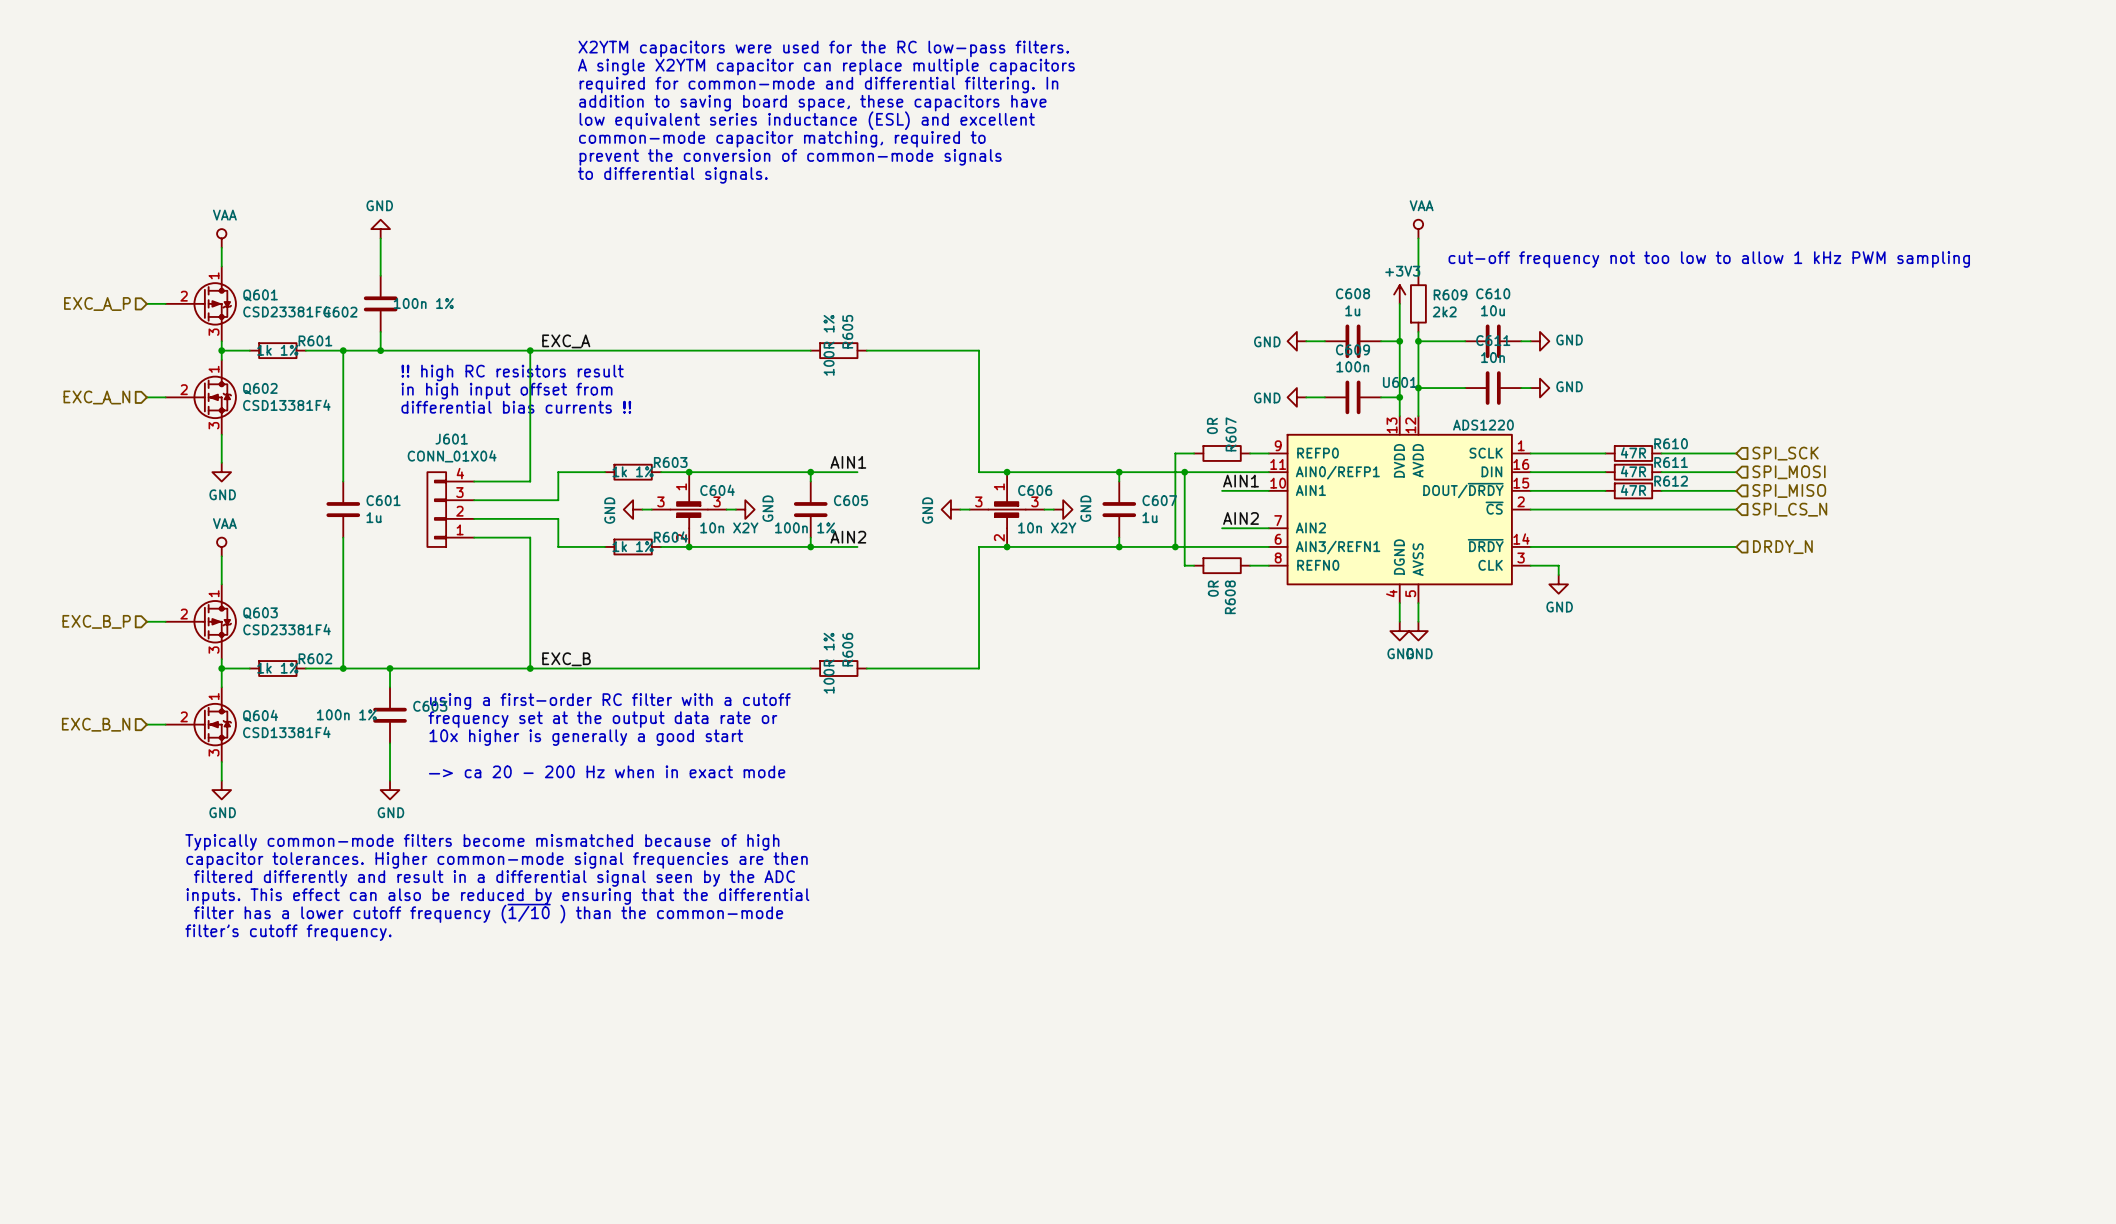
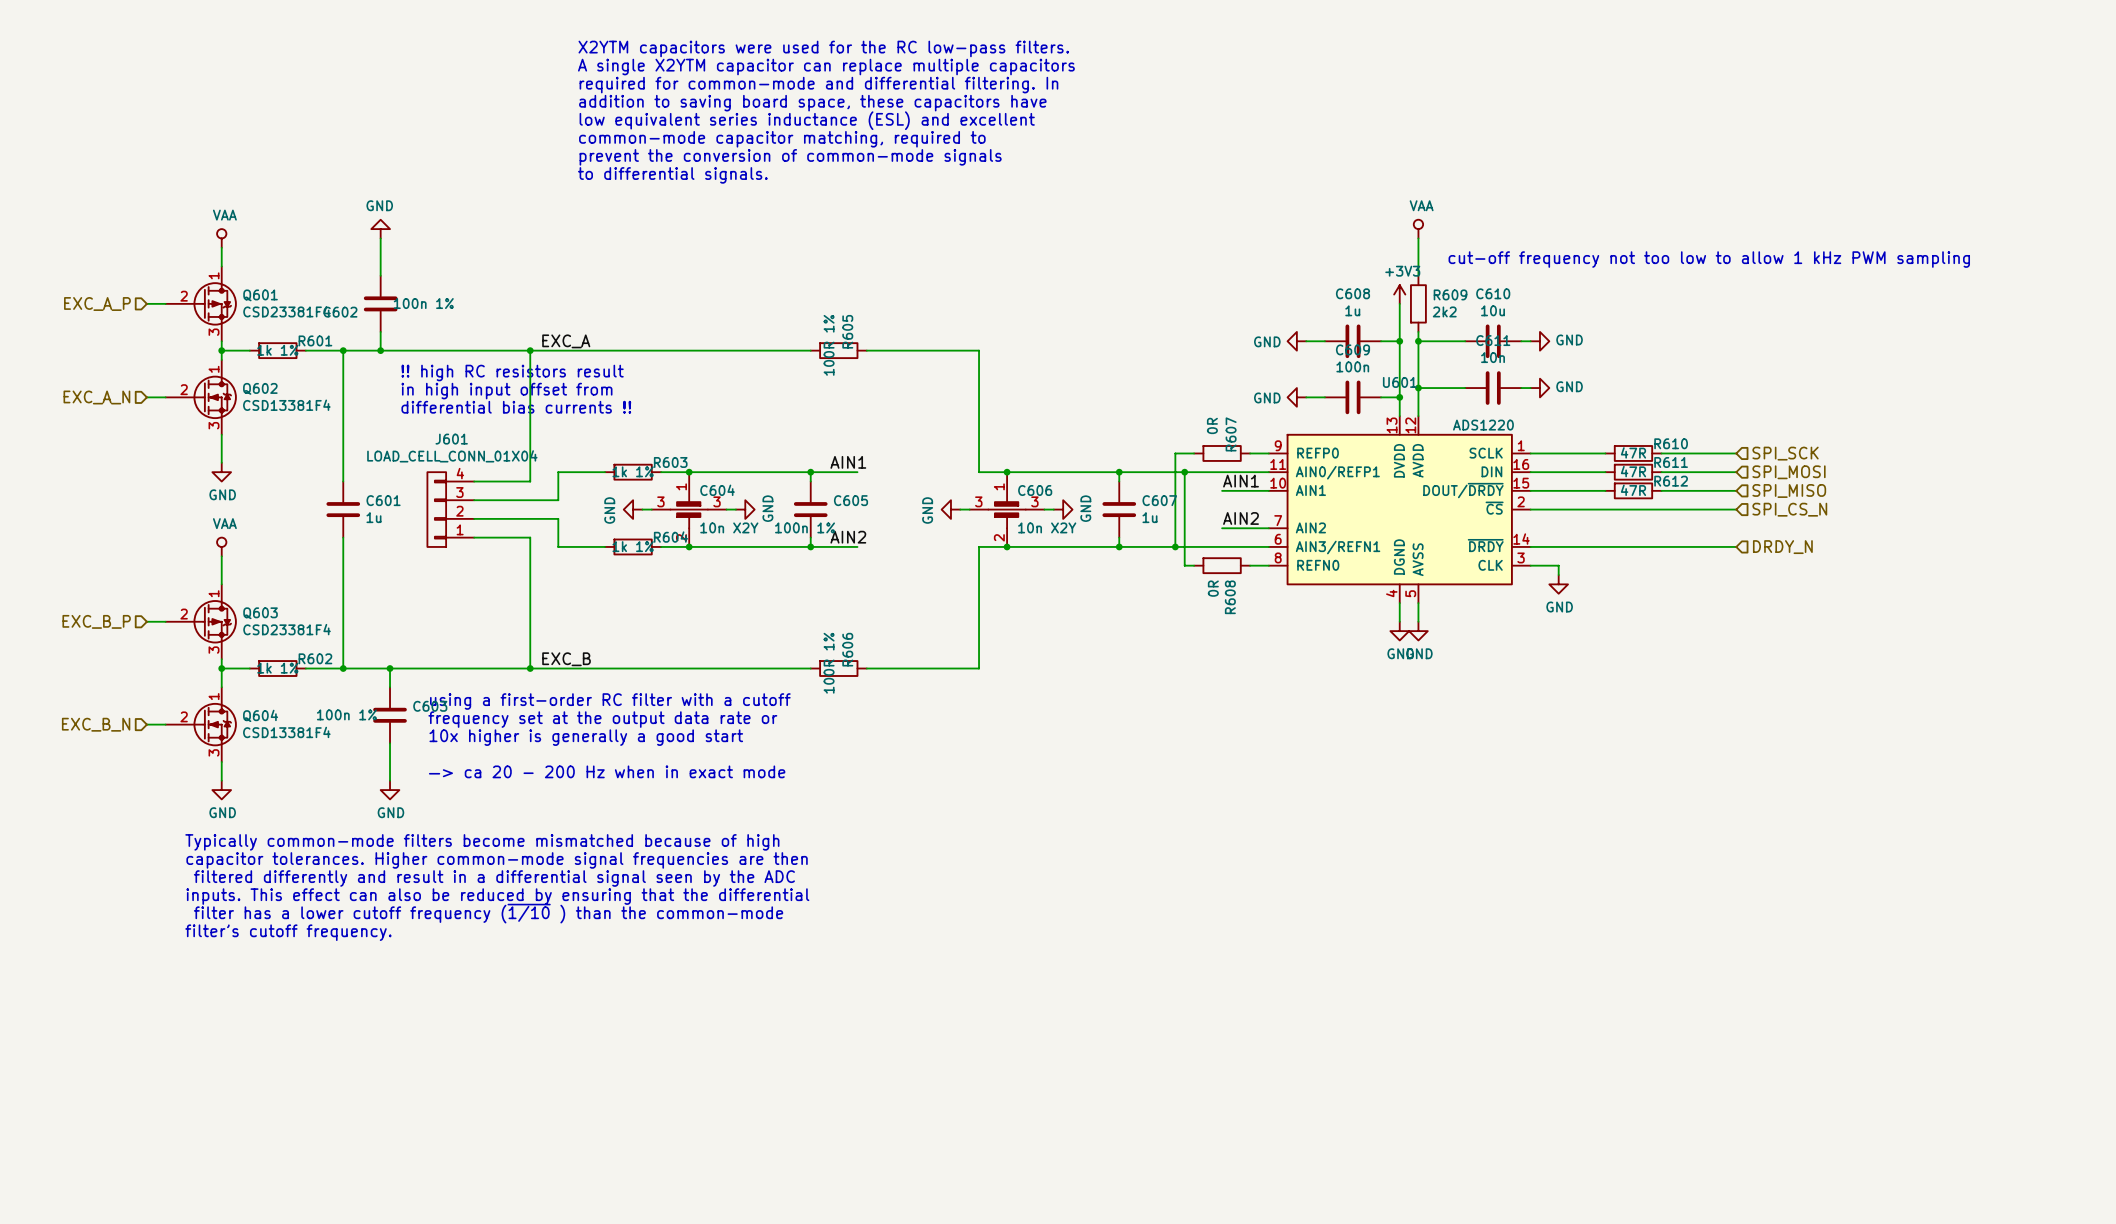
J601 value: CONN_01X04 (452, 456) -> LOAD_CELL_CONN_01X04 (452, 456)

